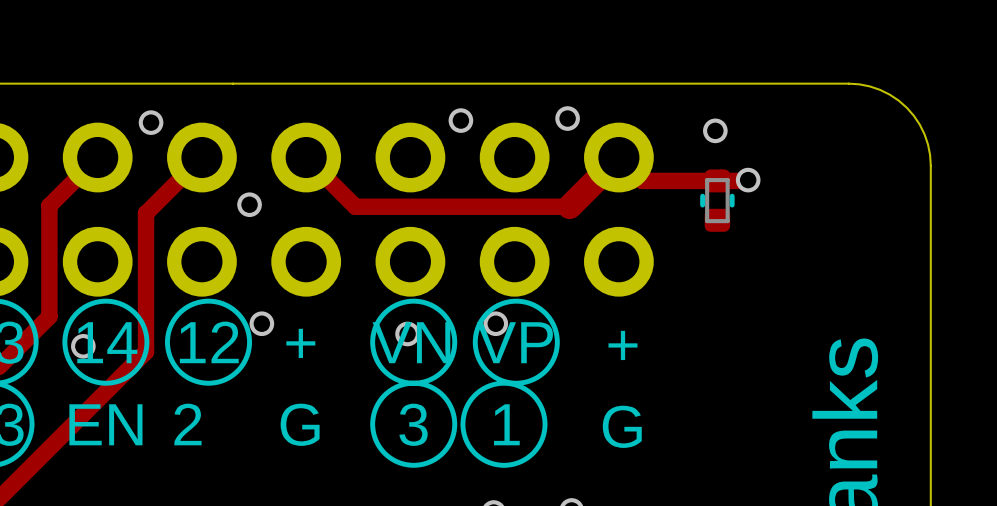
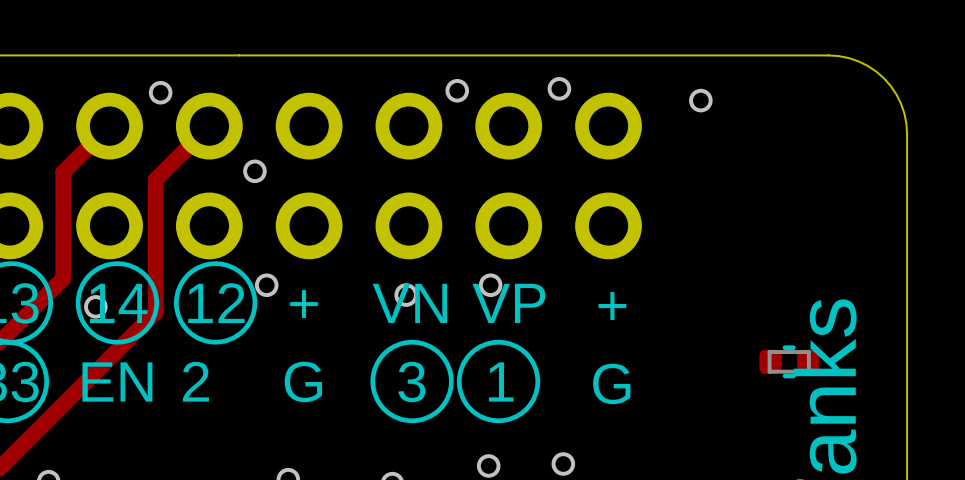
track: (306, 157) (355, 206) (569, 206) (618, 157) (642, 180) (748, 180) -> none
via: (748, 180) -> none
part: (717, 200) -> none
drawing: [370, 298, 560, 386] -> none
part: none -> (789, 361)

